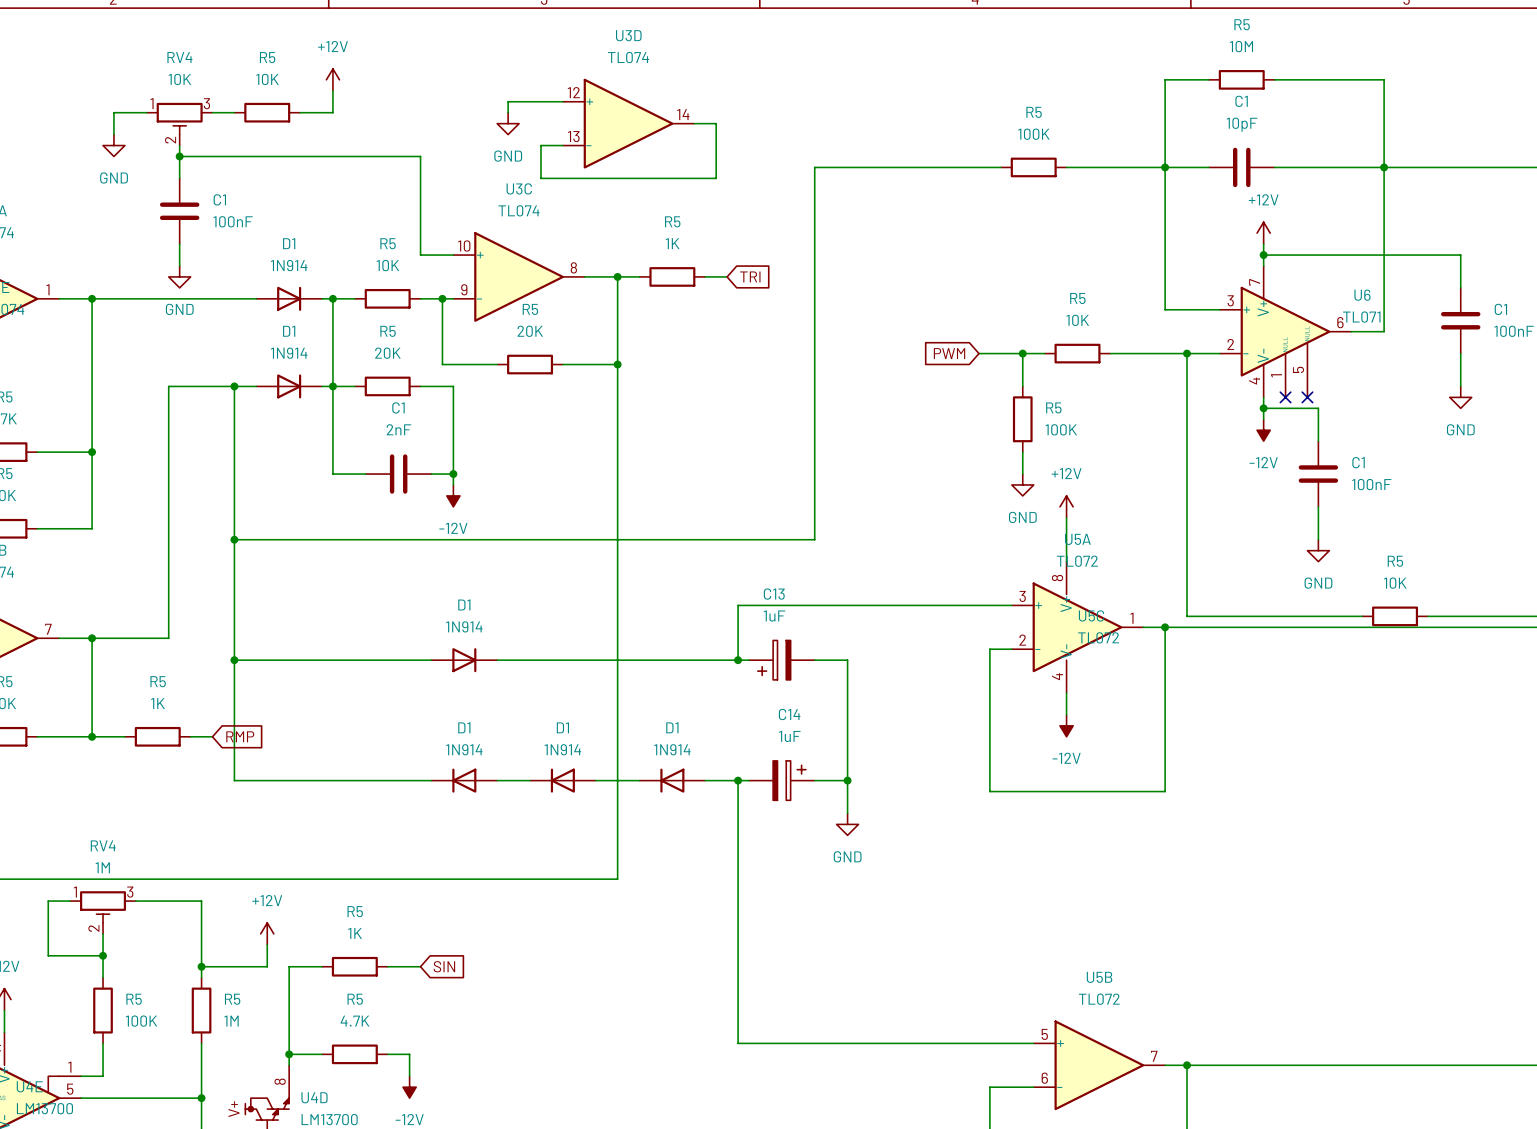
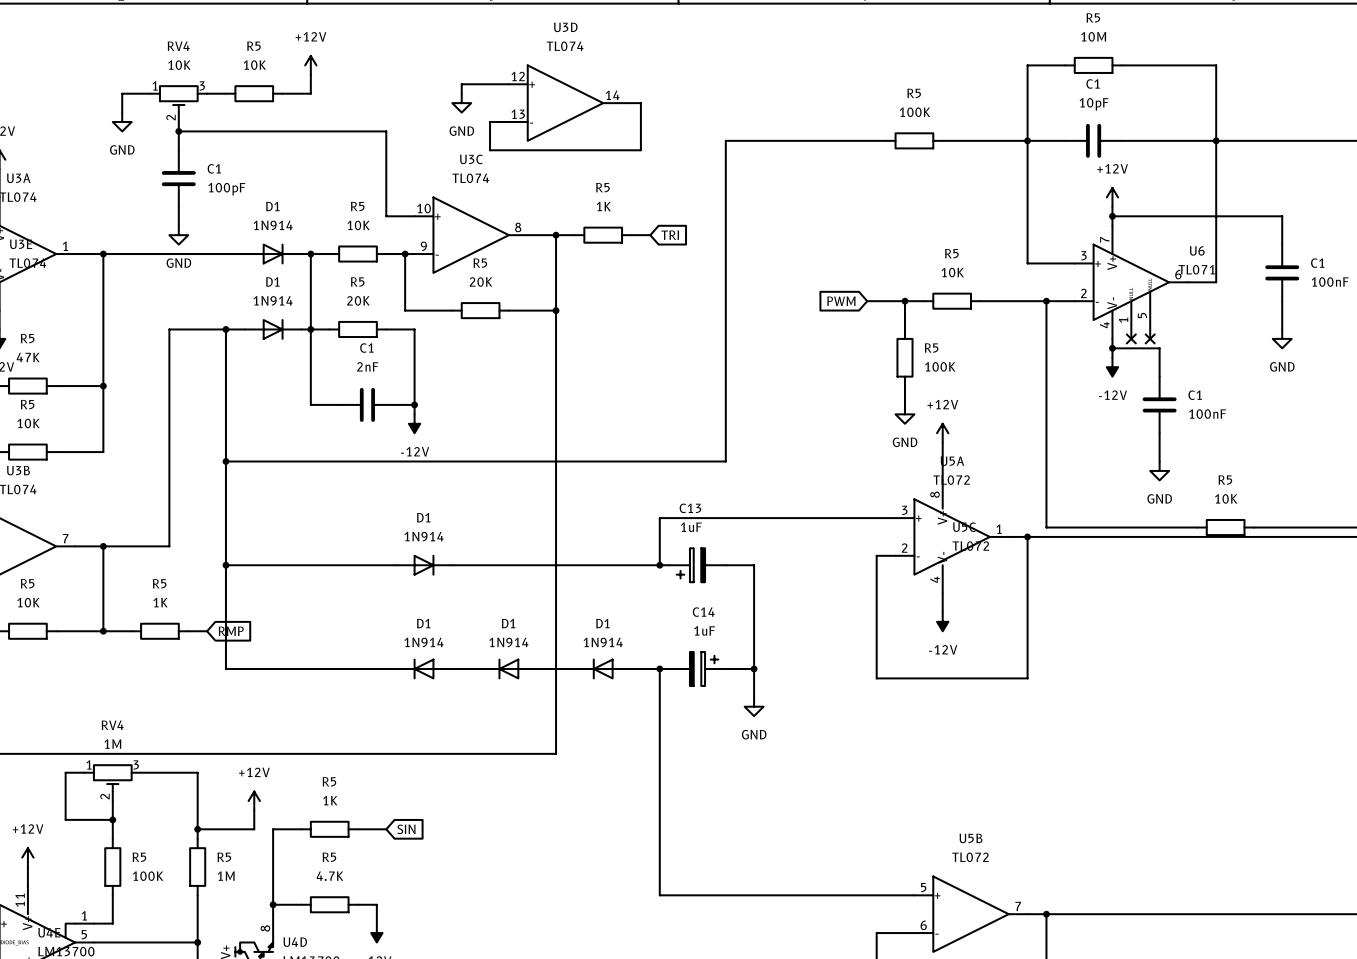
C1 value: 100nF (233, 221) -> 100pF (226, 189)

